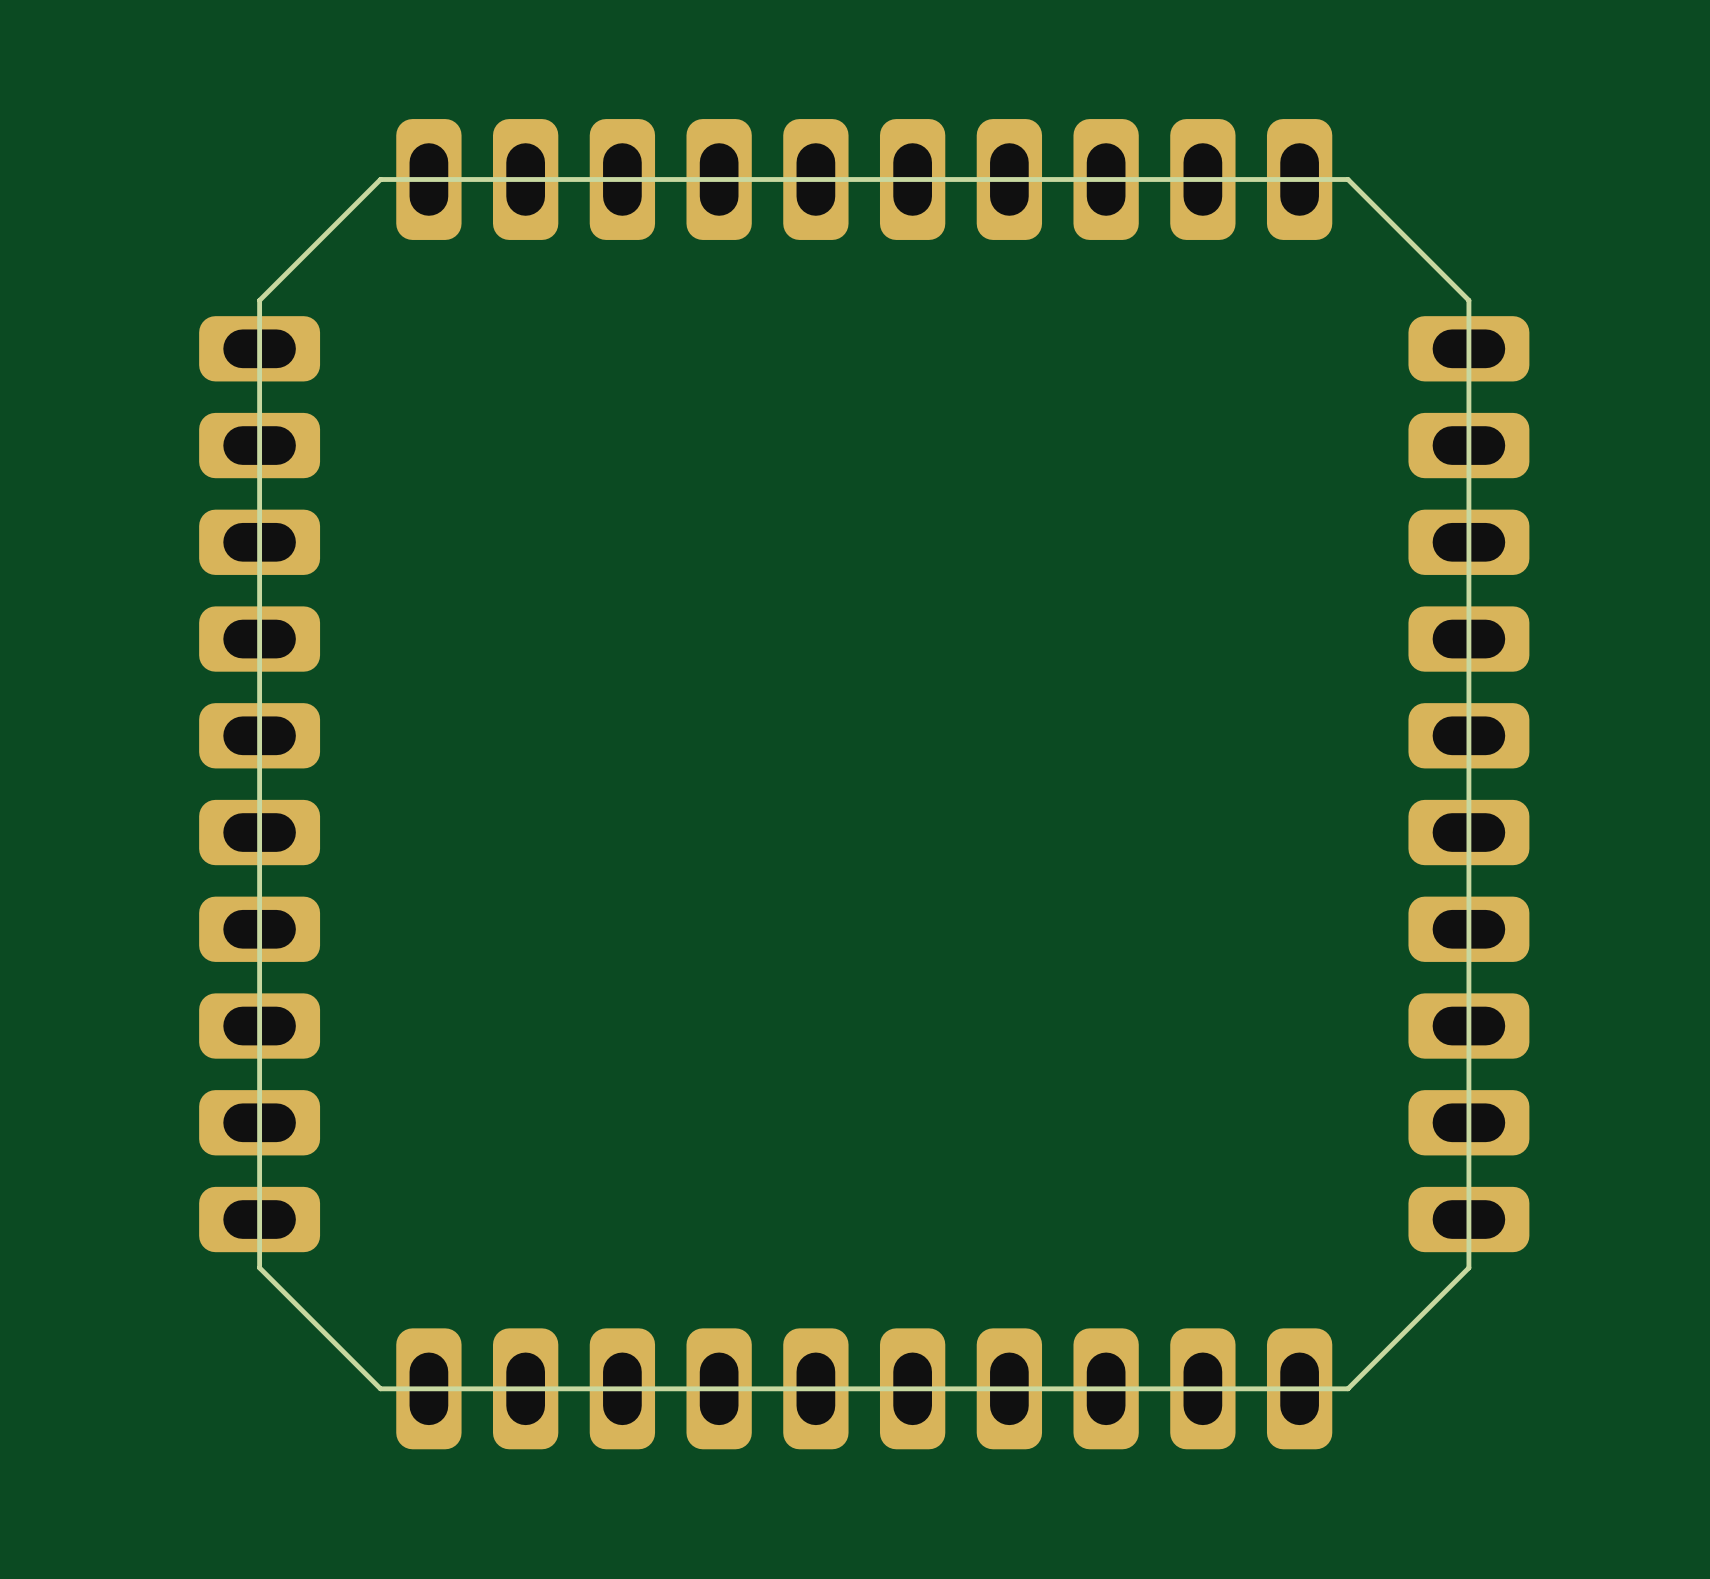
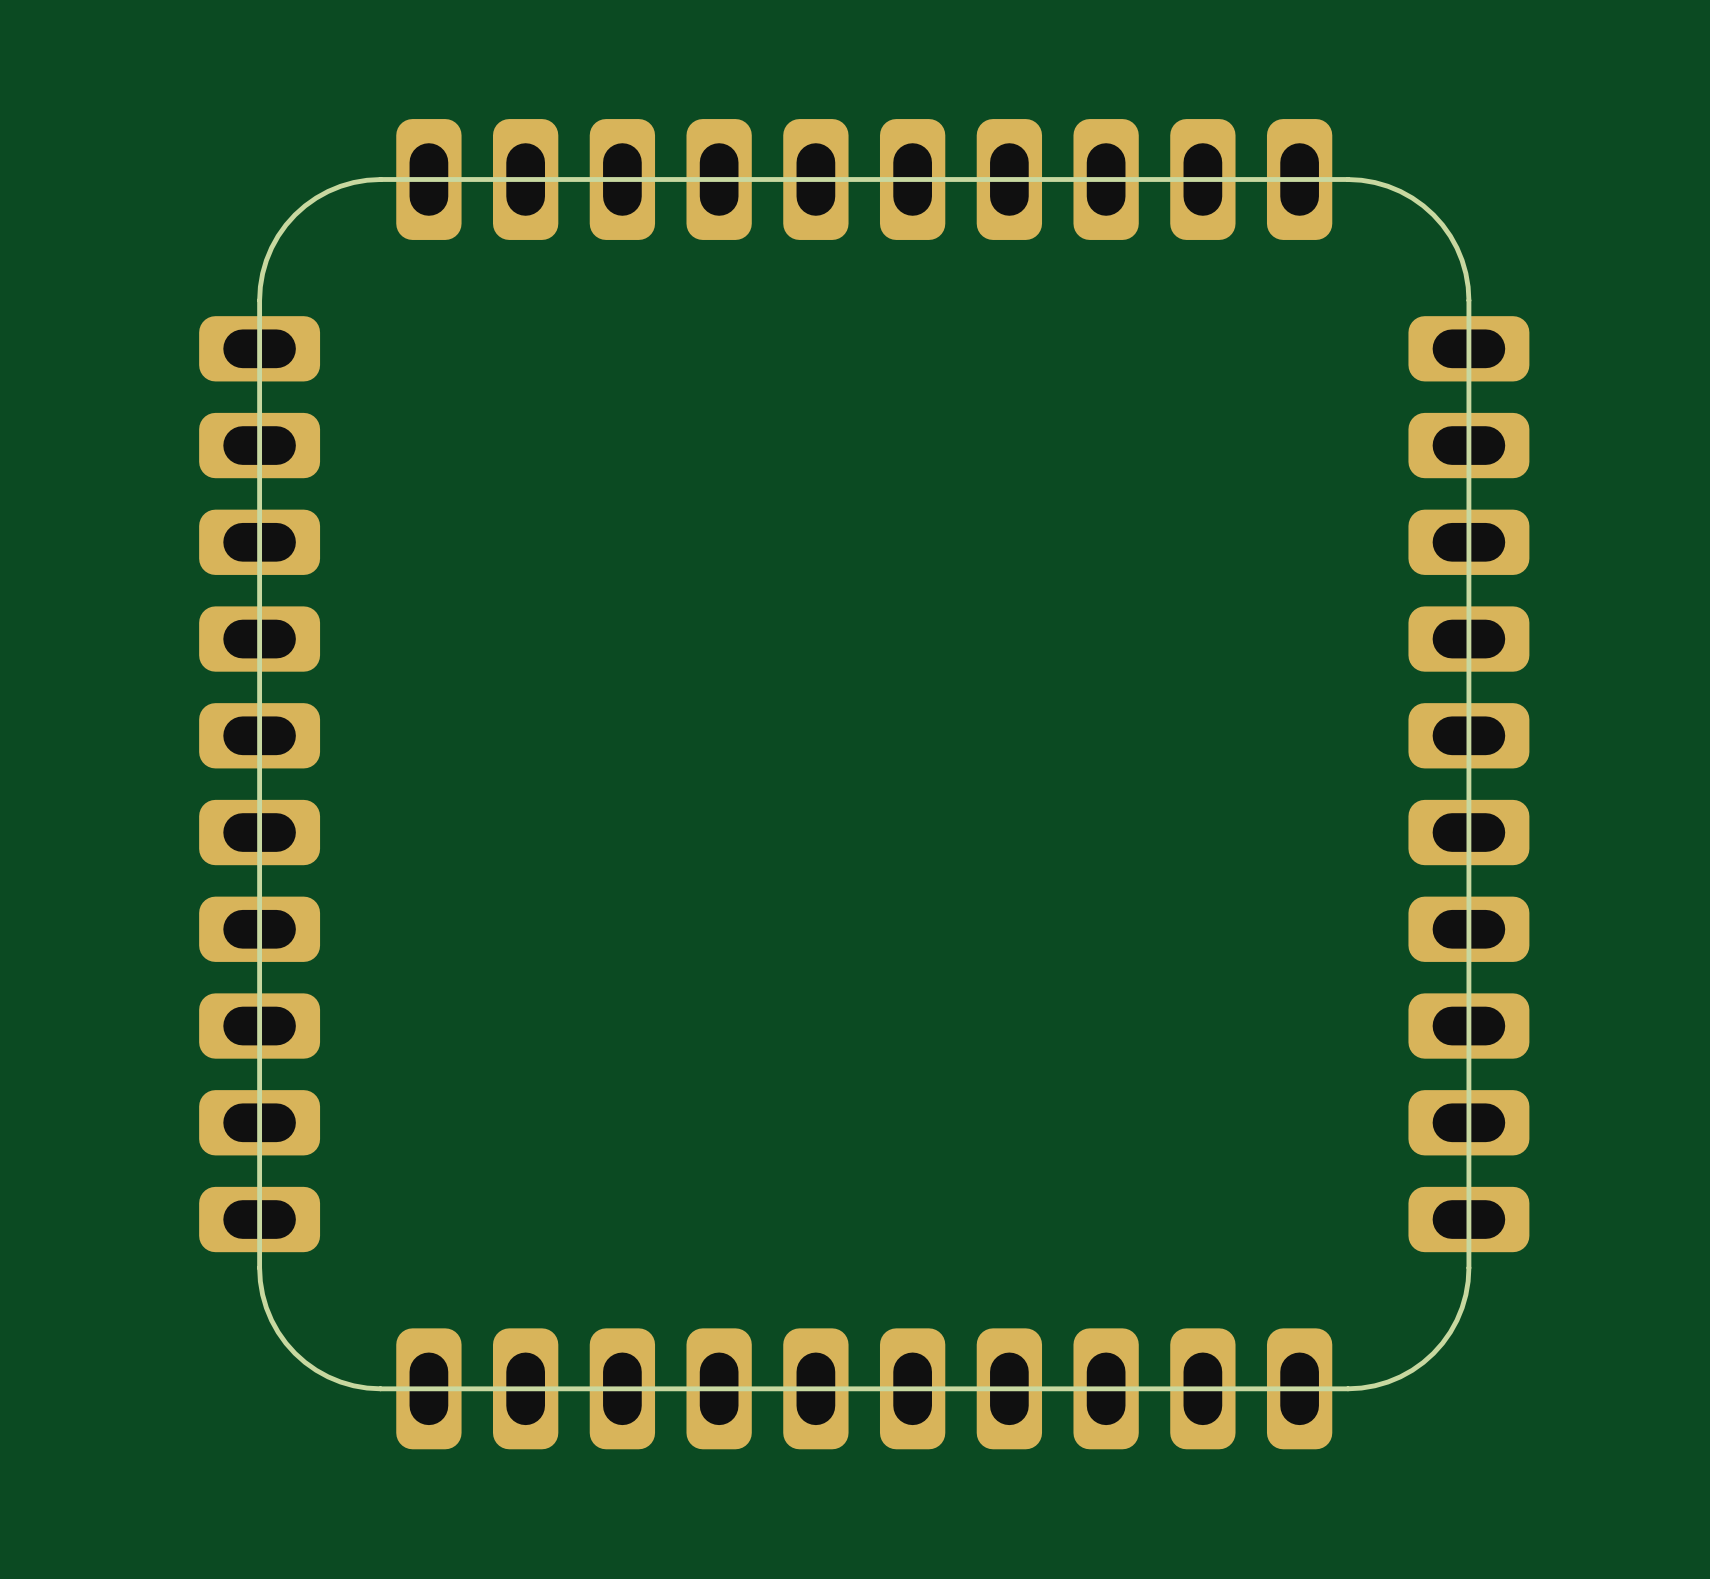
board edge: (380, 179) (259, 300) -> (380, 179) (366, 180) (340, 186) (316, 198) (295, 214) (285, 225) (271, 247) (262, 273) (259, 300)
board edge: (1347, 179) (1468, 300) -> (1347, 179) (1361, 180) (1387, 186) (1412, 198) (1433, 214) (1450, 236) (1456, 247) (1465, 273) (1468, 300)
board edge: (259, 1267) (380, 1388) -> (259, 1267) (262, 1294) (271, 1320) (285, 1343) (295, 1353) (316, 1370) (328, 1376) (353, 1385) (380, 1388)
board edge: (1468, 1267) (1347, 1388) -> (1468, 1267) (1468, 1281) (1462, 1307) (1450, 1332) (1433, 1353) (1412, 1370) (1387, 1382) (1374, 1385) (1347, 1388)

